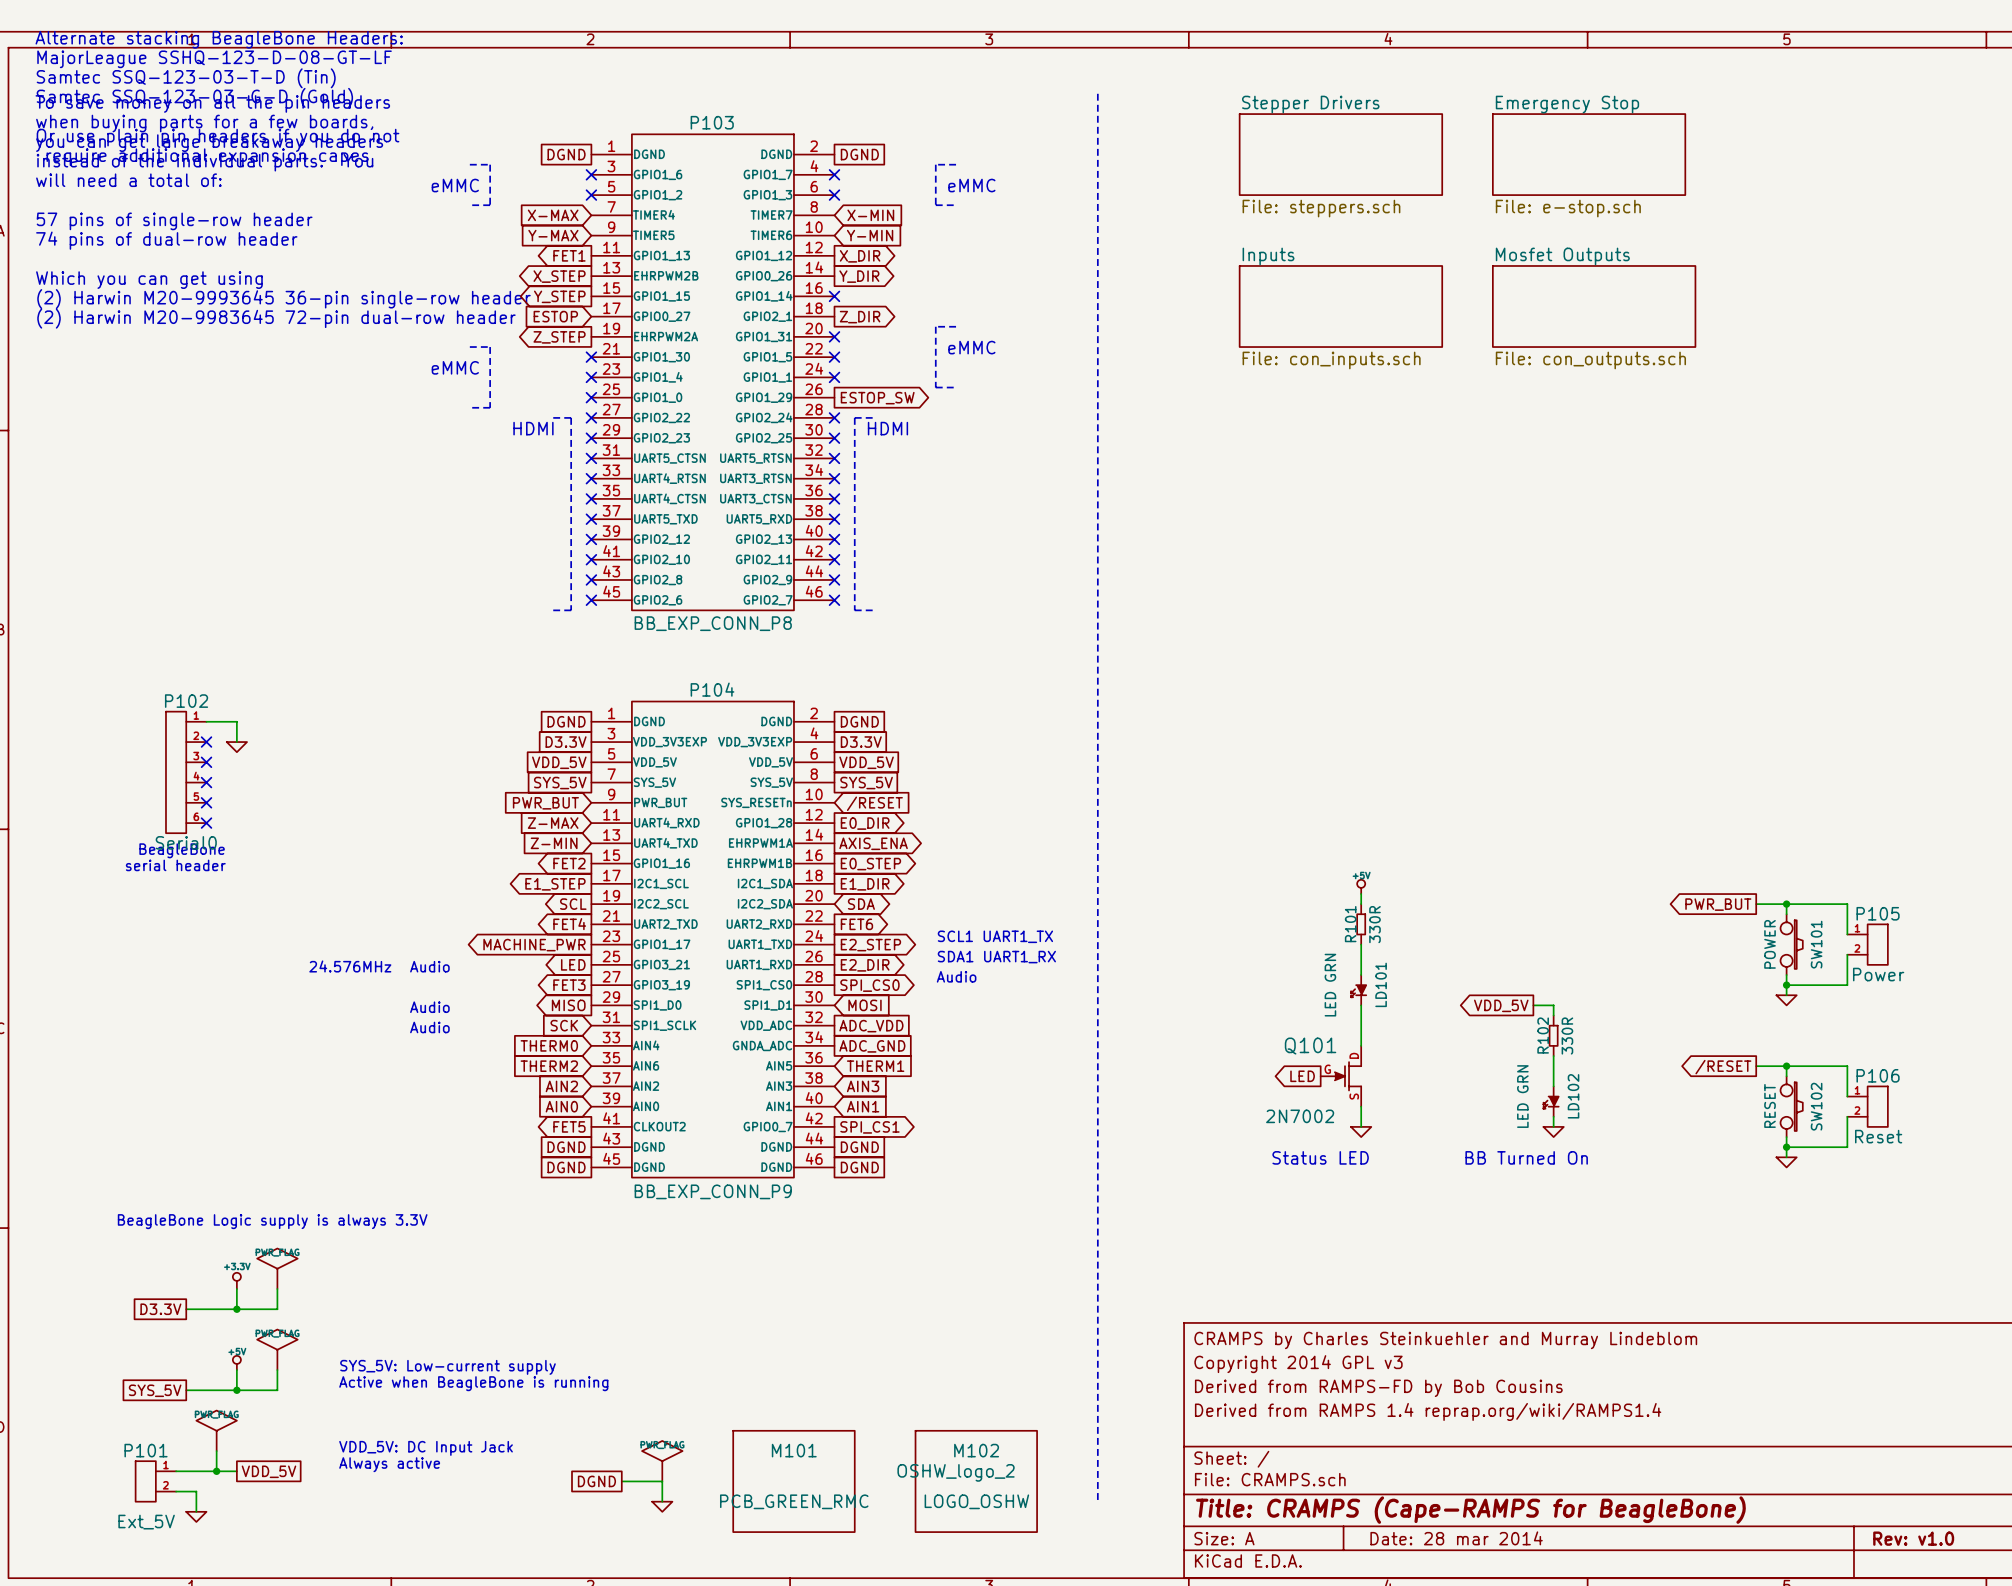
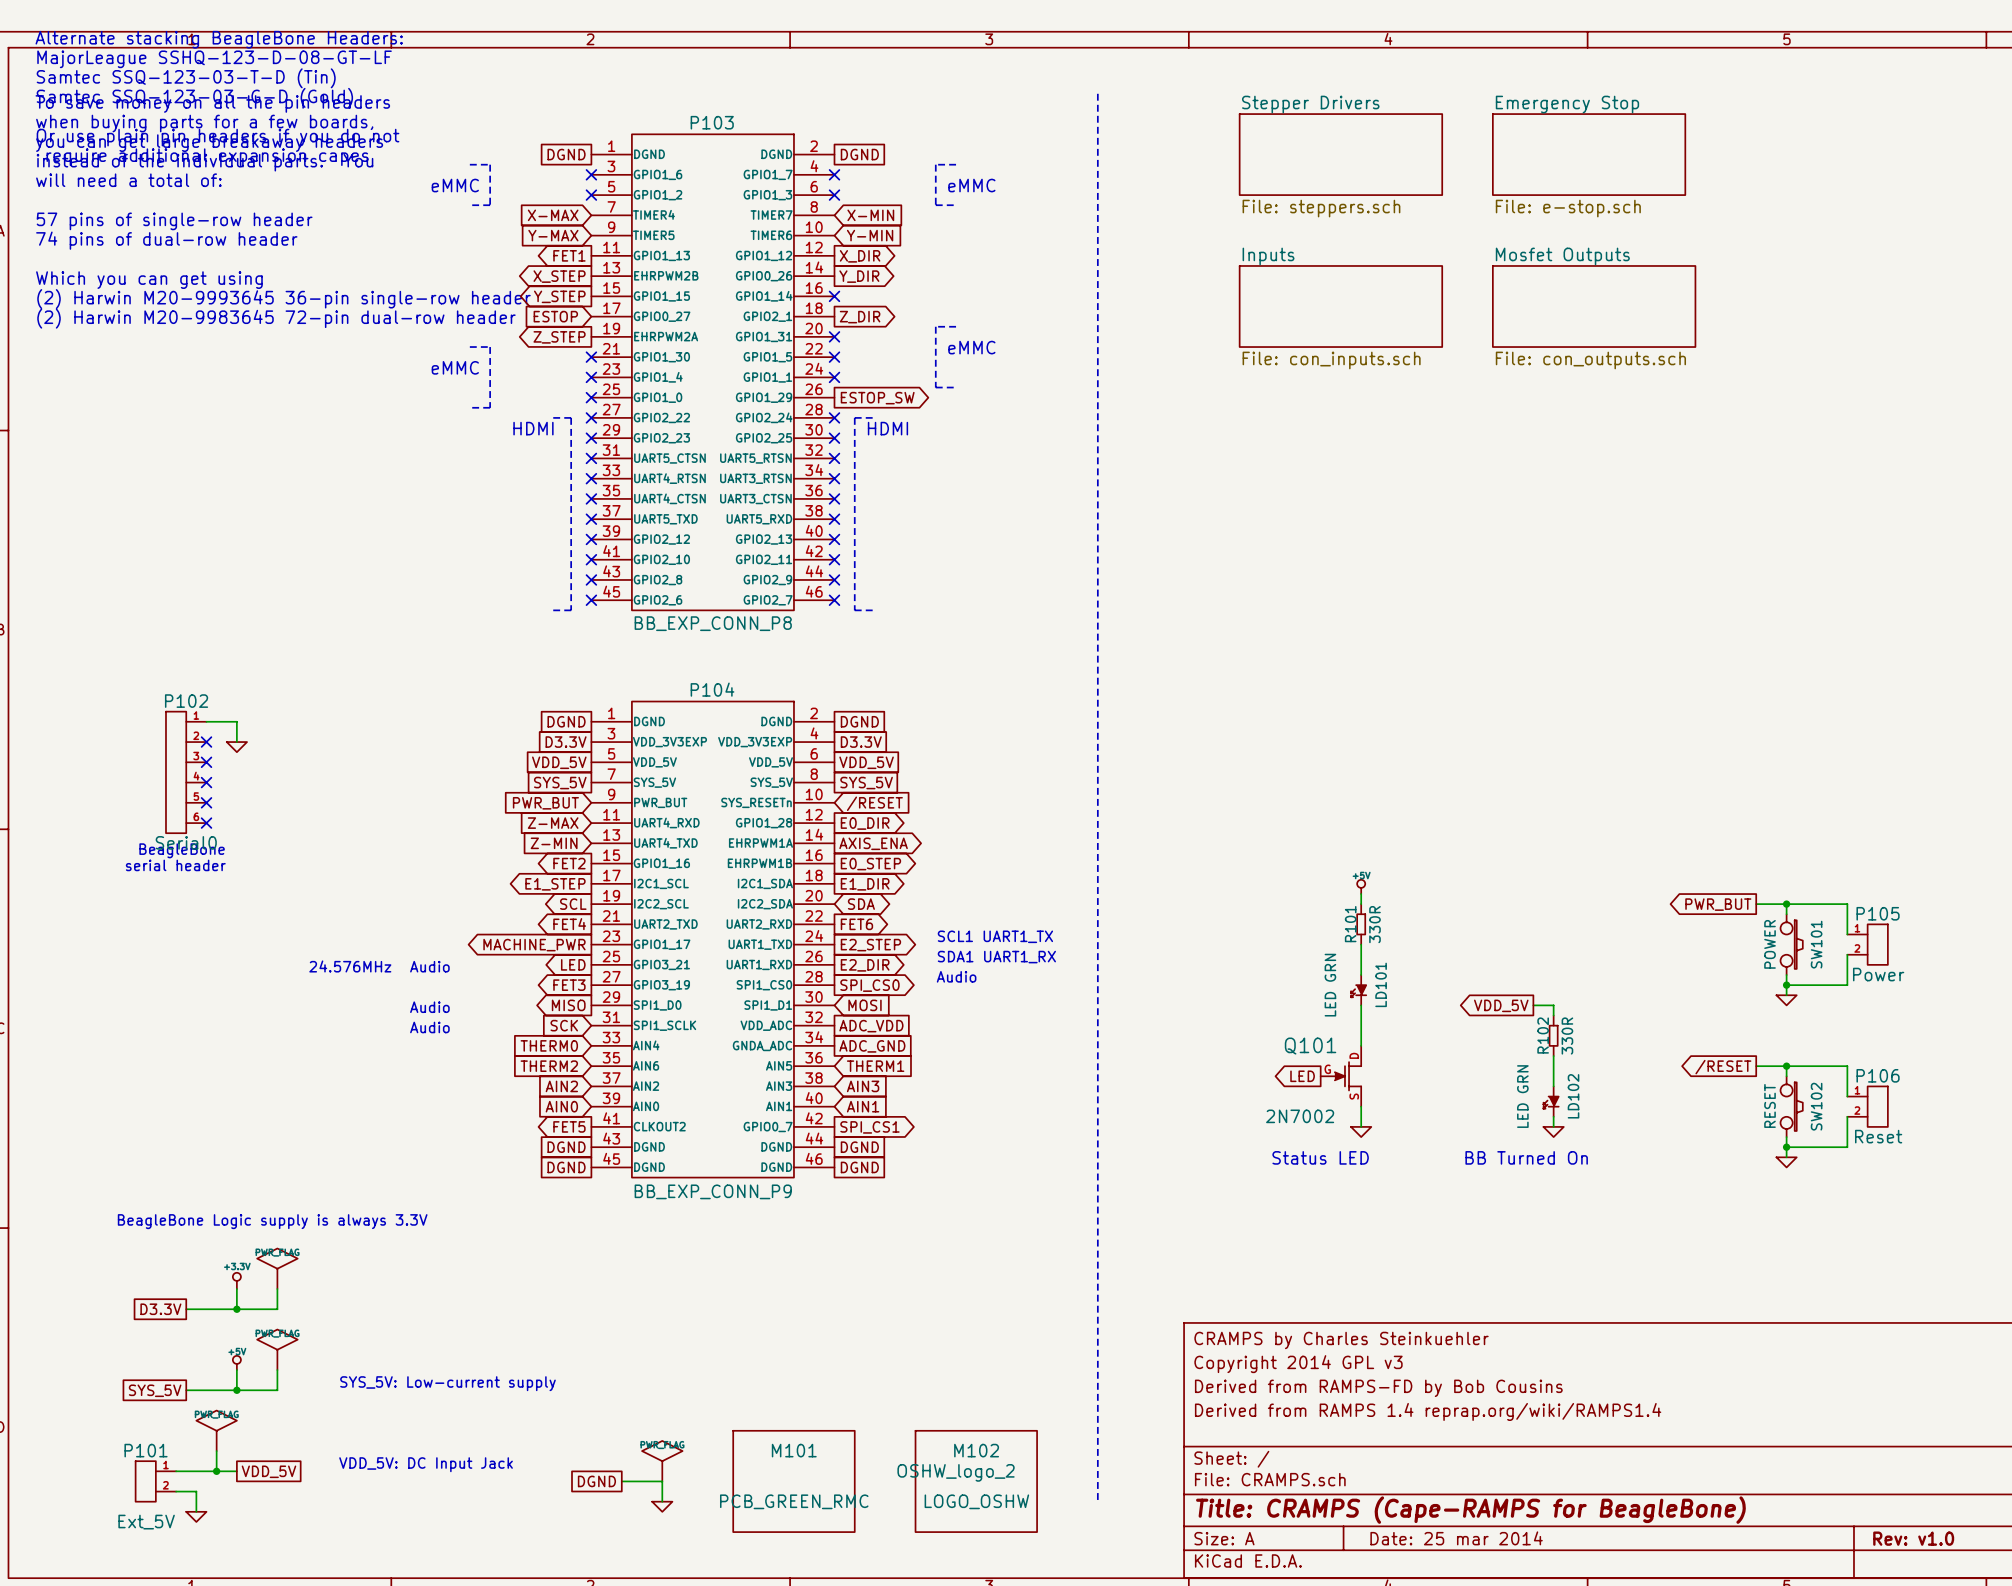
title block: CRAMPS by Charles Steinkuehler and Murray Lindeblom (1445, 1340) -> CRAMPS by Charles Steinkuehler (1341, 1340)
text: SYS_5V: Low-current supply (447, 1367) -> none
text: Active when BeagleBone is running (473, 1383) -> SYS_5V: Low-current supply (447, 1383)
text: VDD_5V: DC Input Jack (426, 1448) -> none
text: Always active (389, 1464) -> VDD_5V: DC Input Jack (426, 1464)
title block: Date: 28 mar 2014 (1456, 1538) -> Date: 25 mar 2014 (1456, 1538)

